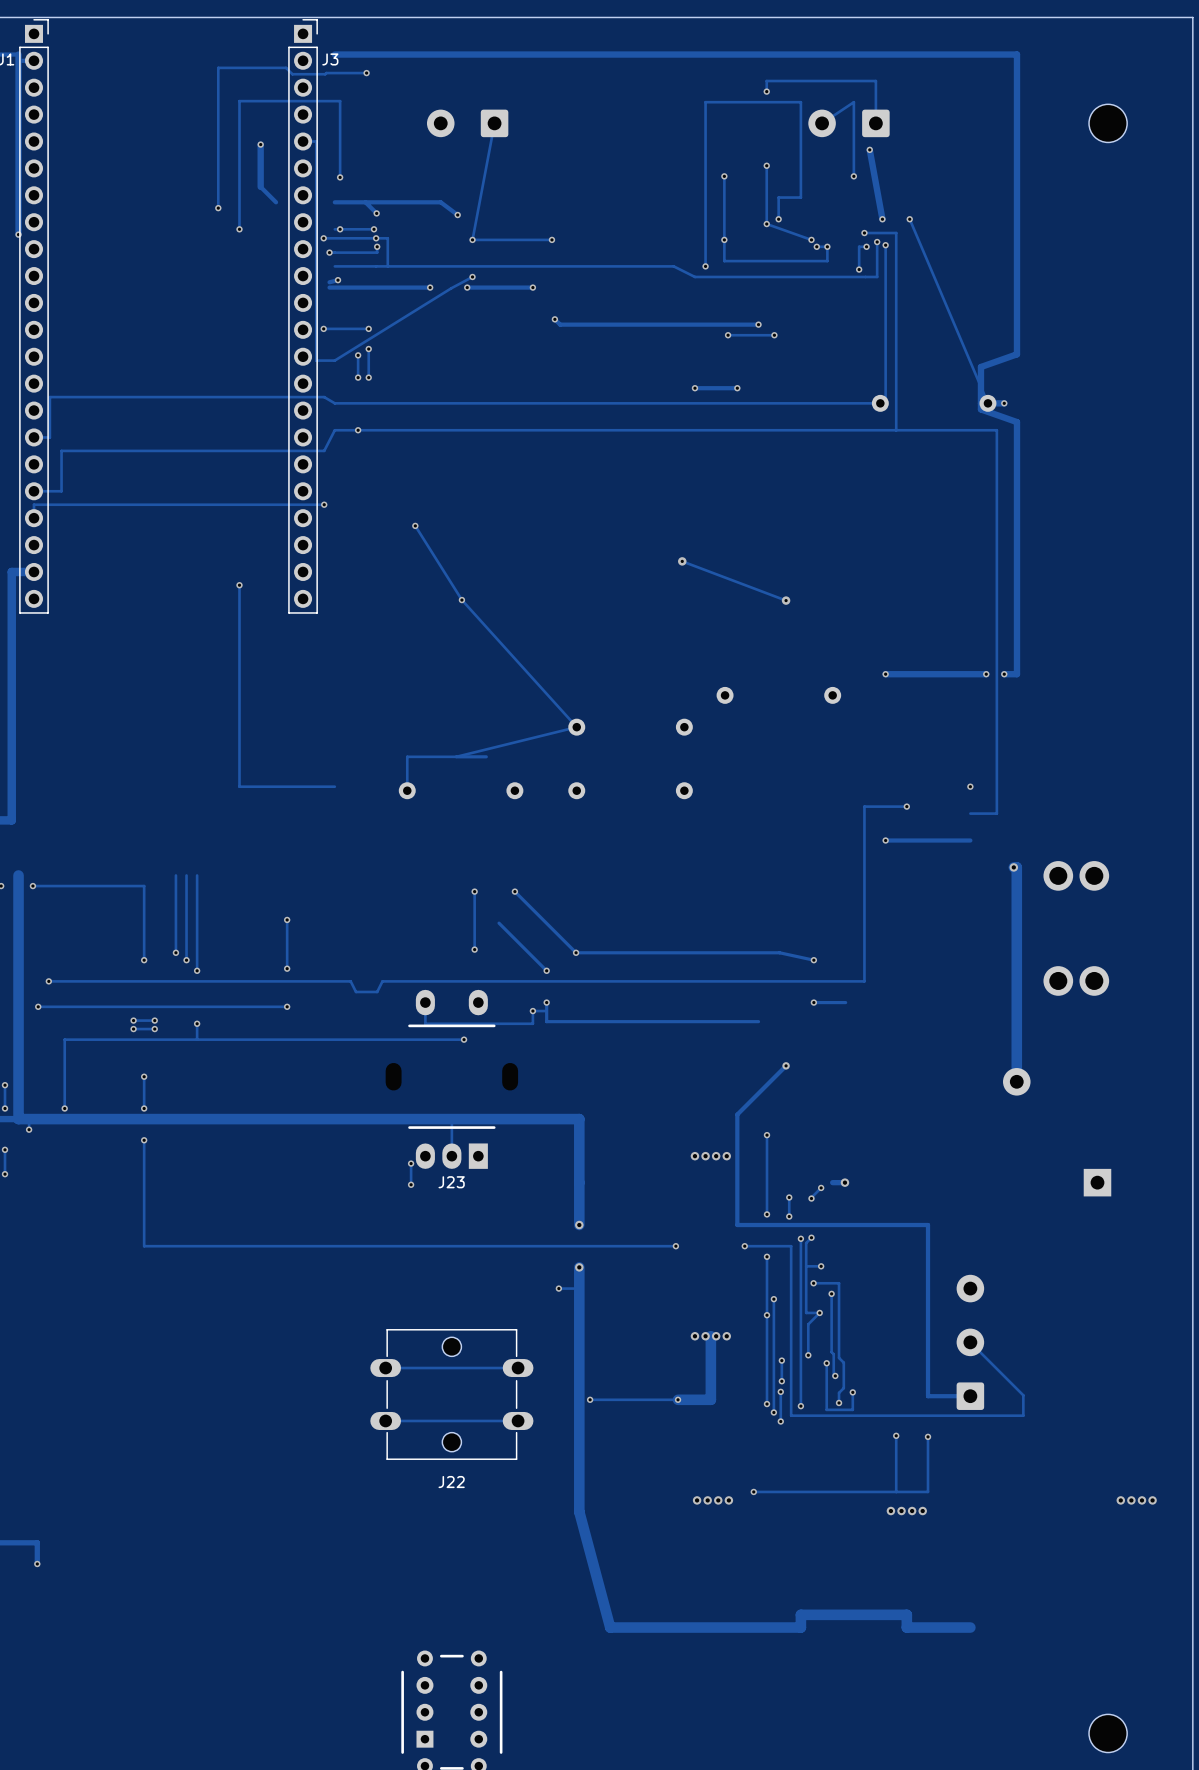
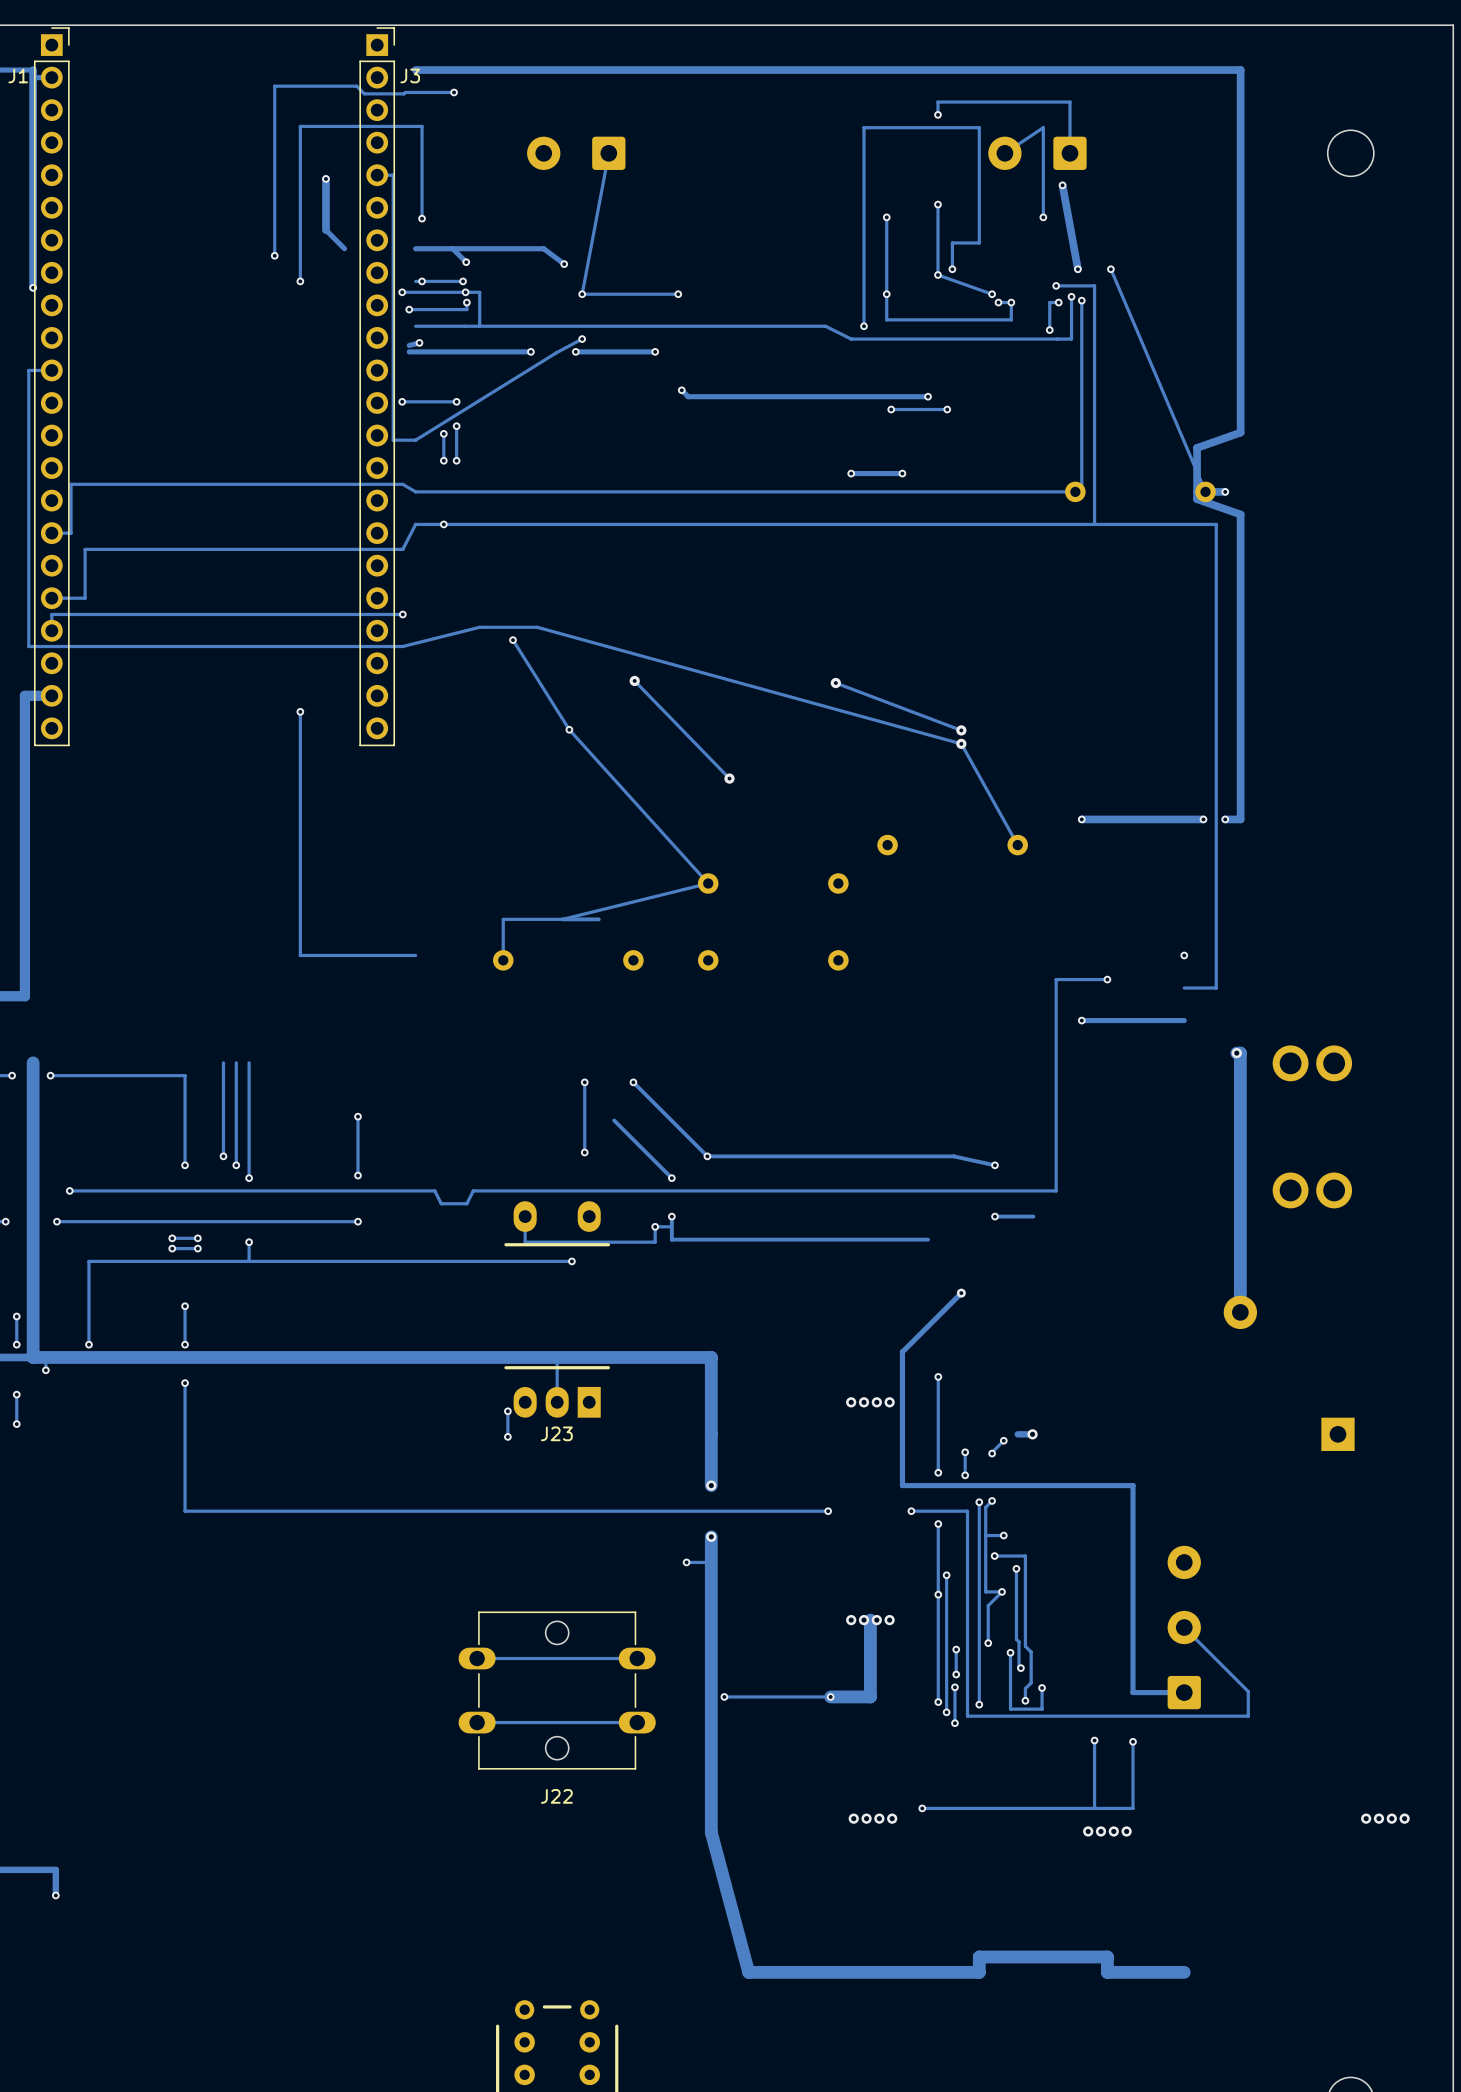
track: none -> (51, 370) (28, 370) (28, 646) (402, 646) (479, 627) (537, 627) (961, 743) (1017, 845)
track: none -> (634, 680) (729, 778)
via: none -> (634, 680)
via: none -> (961, 743)
via: none -> (729, 778)

